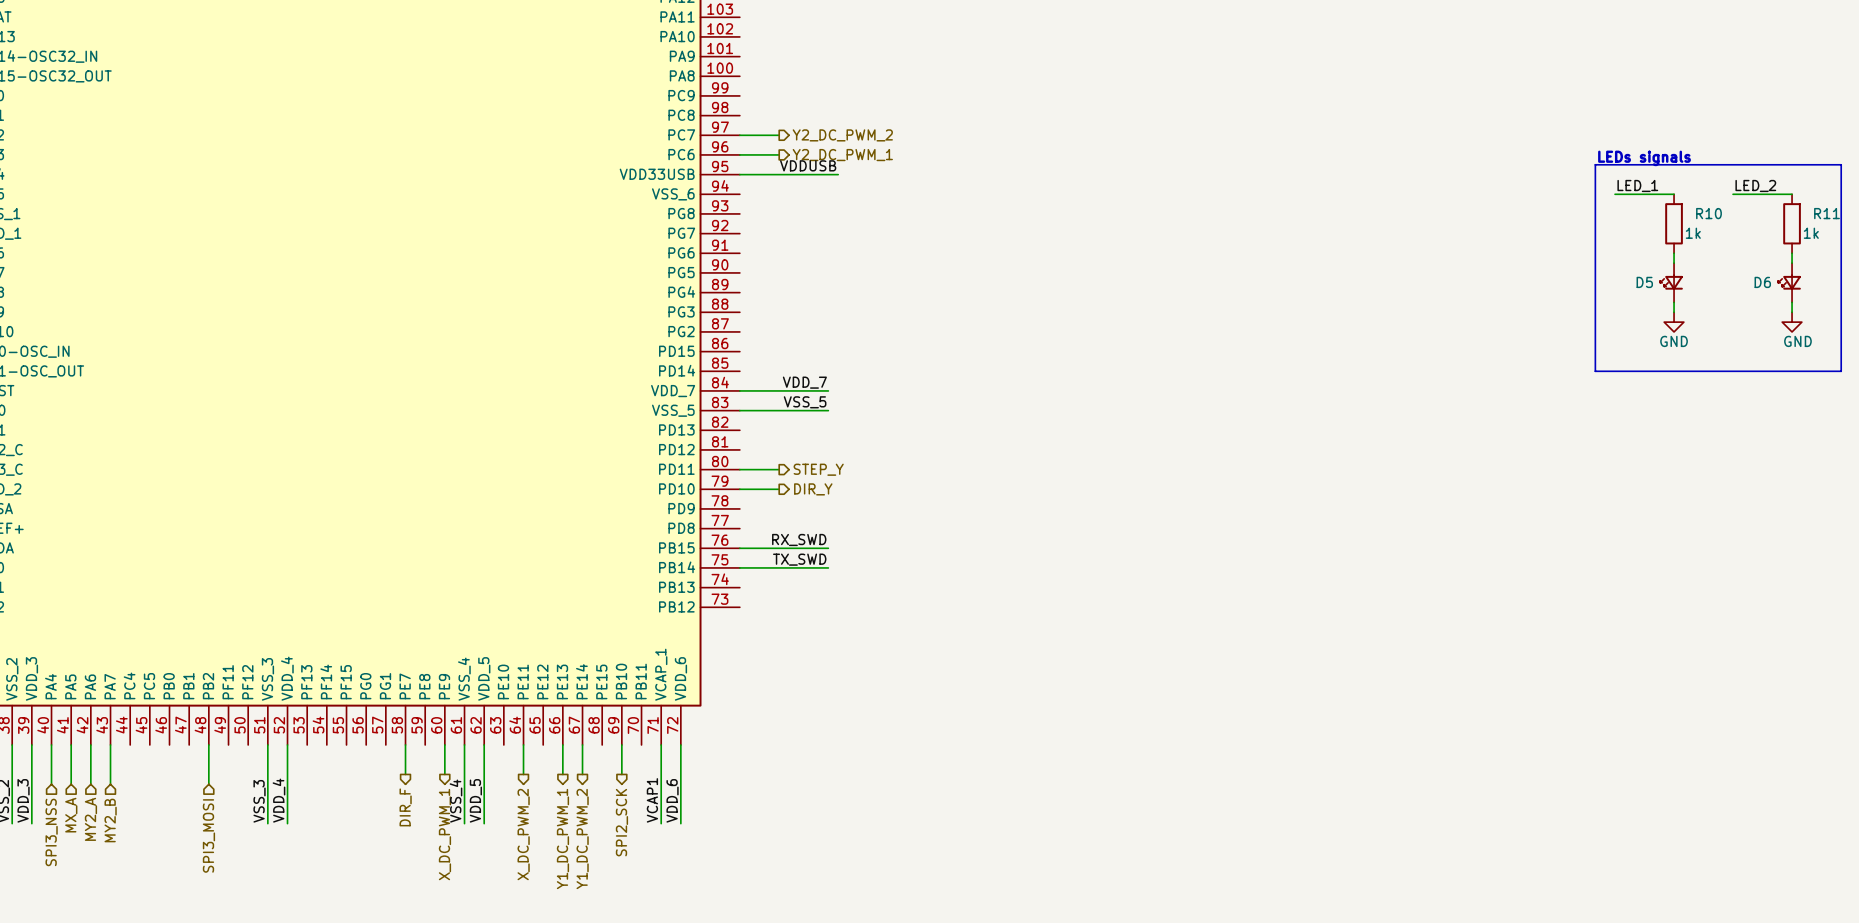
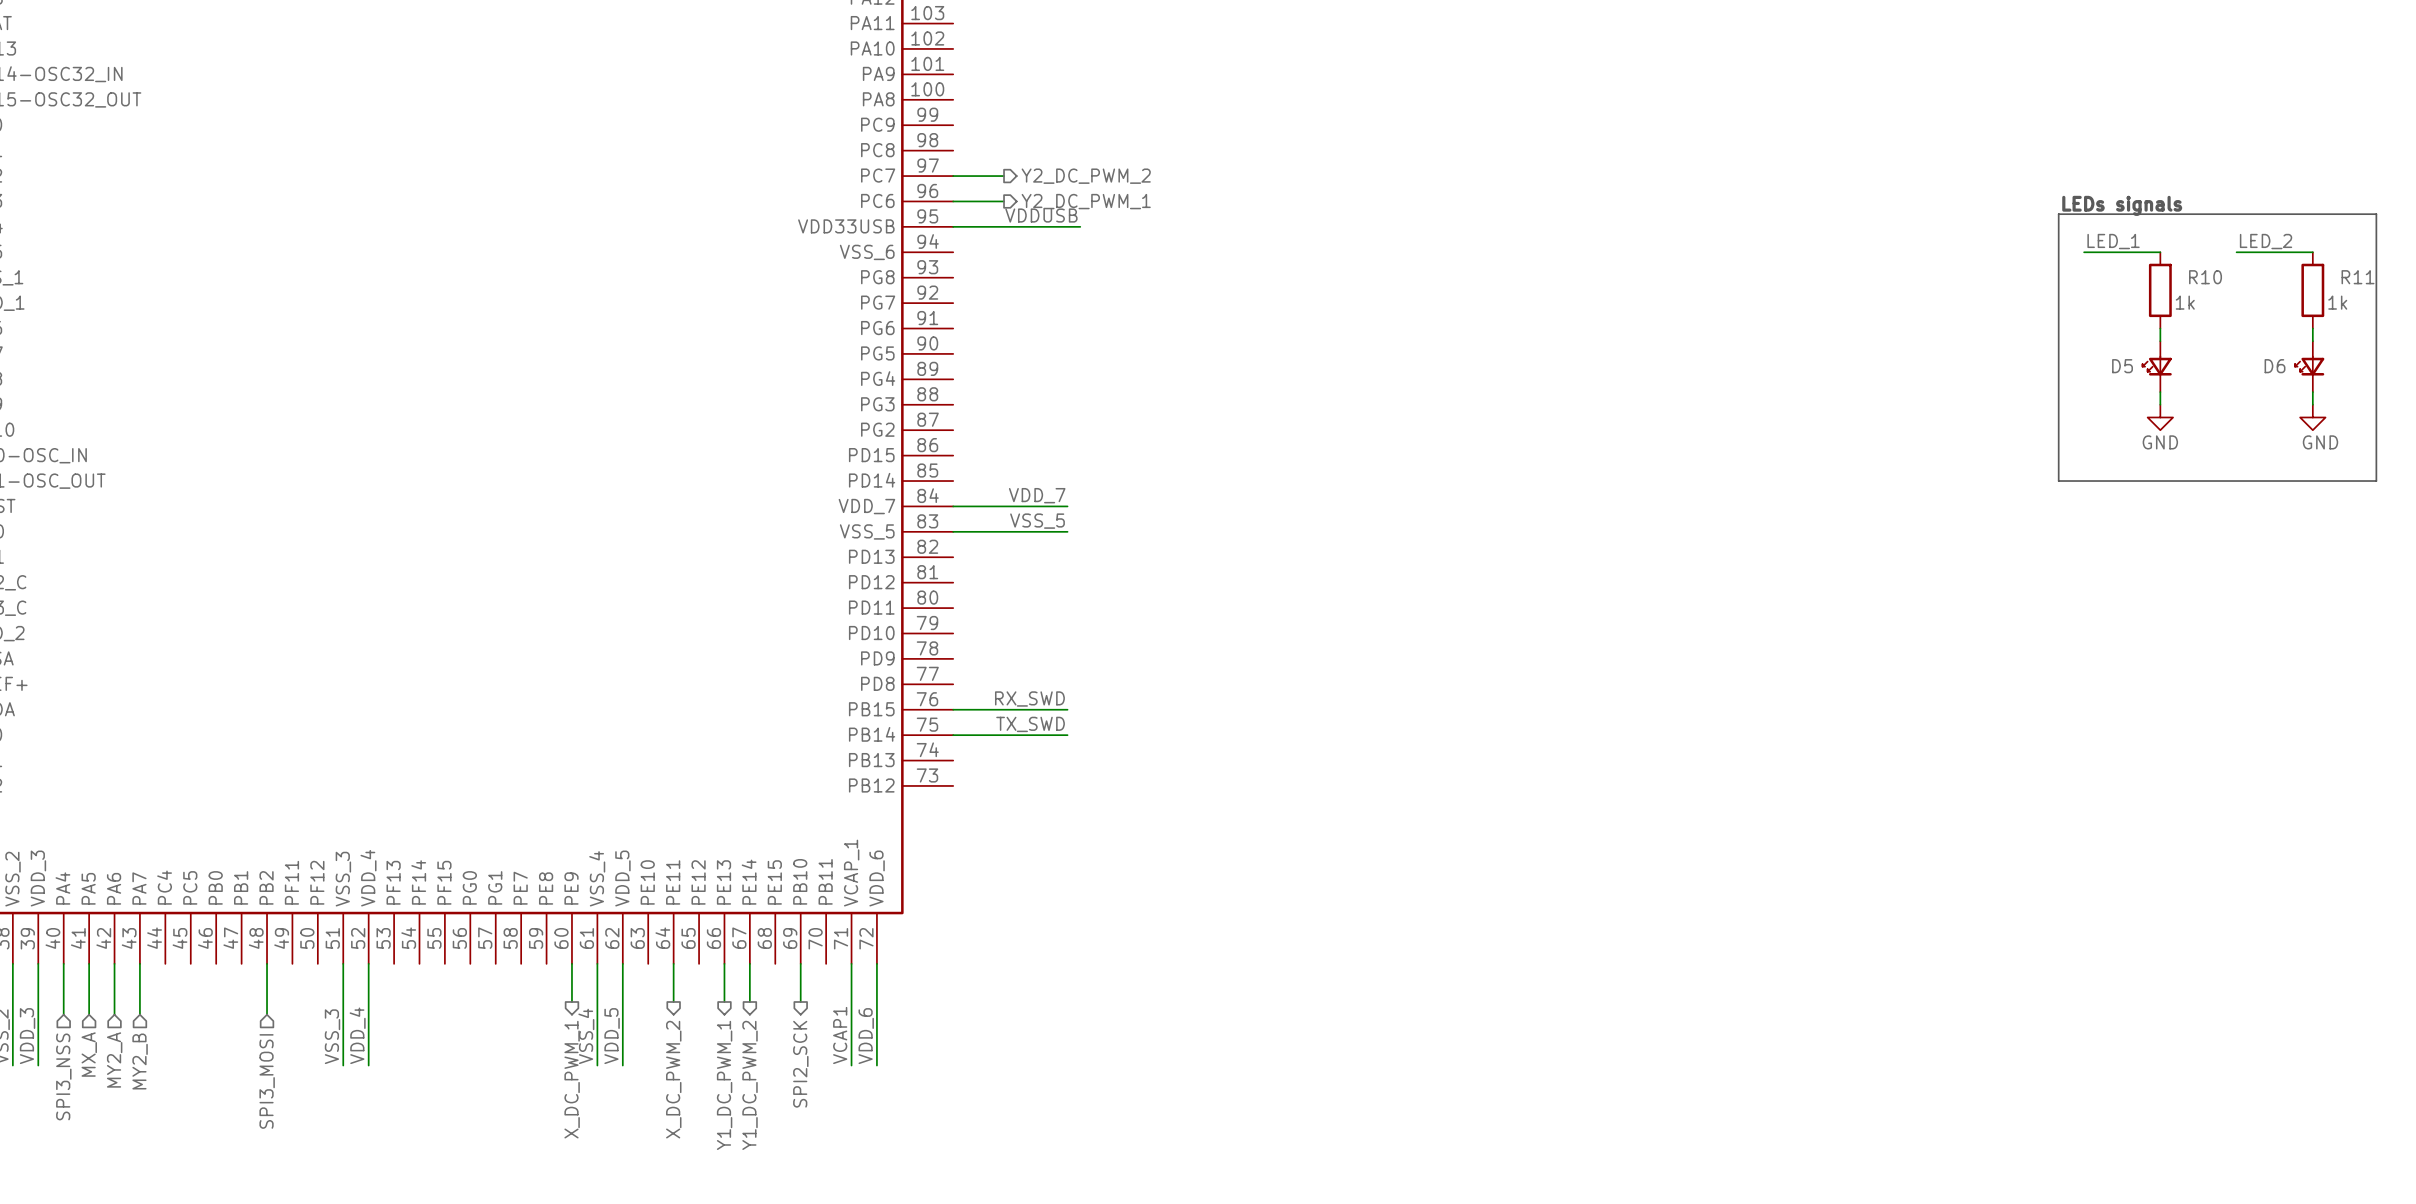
wire: (739, 469) (779, 469) -> none
hierarchical label: STEP_Y (818, 469) -> none
wire: (739, 489) (779, 489) -> none
hierarchical label: DIR_Y (813, 489) -> none
wire: (405, 744) (405, 774) -> none
hierarchical label: DIR_F (405, 807) -> none

